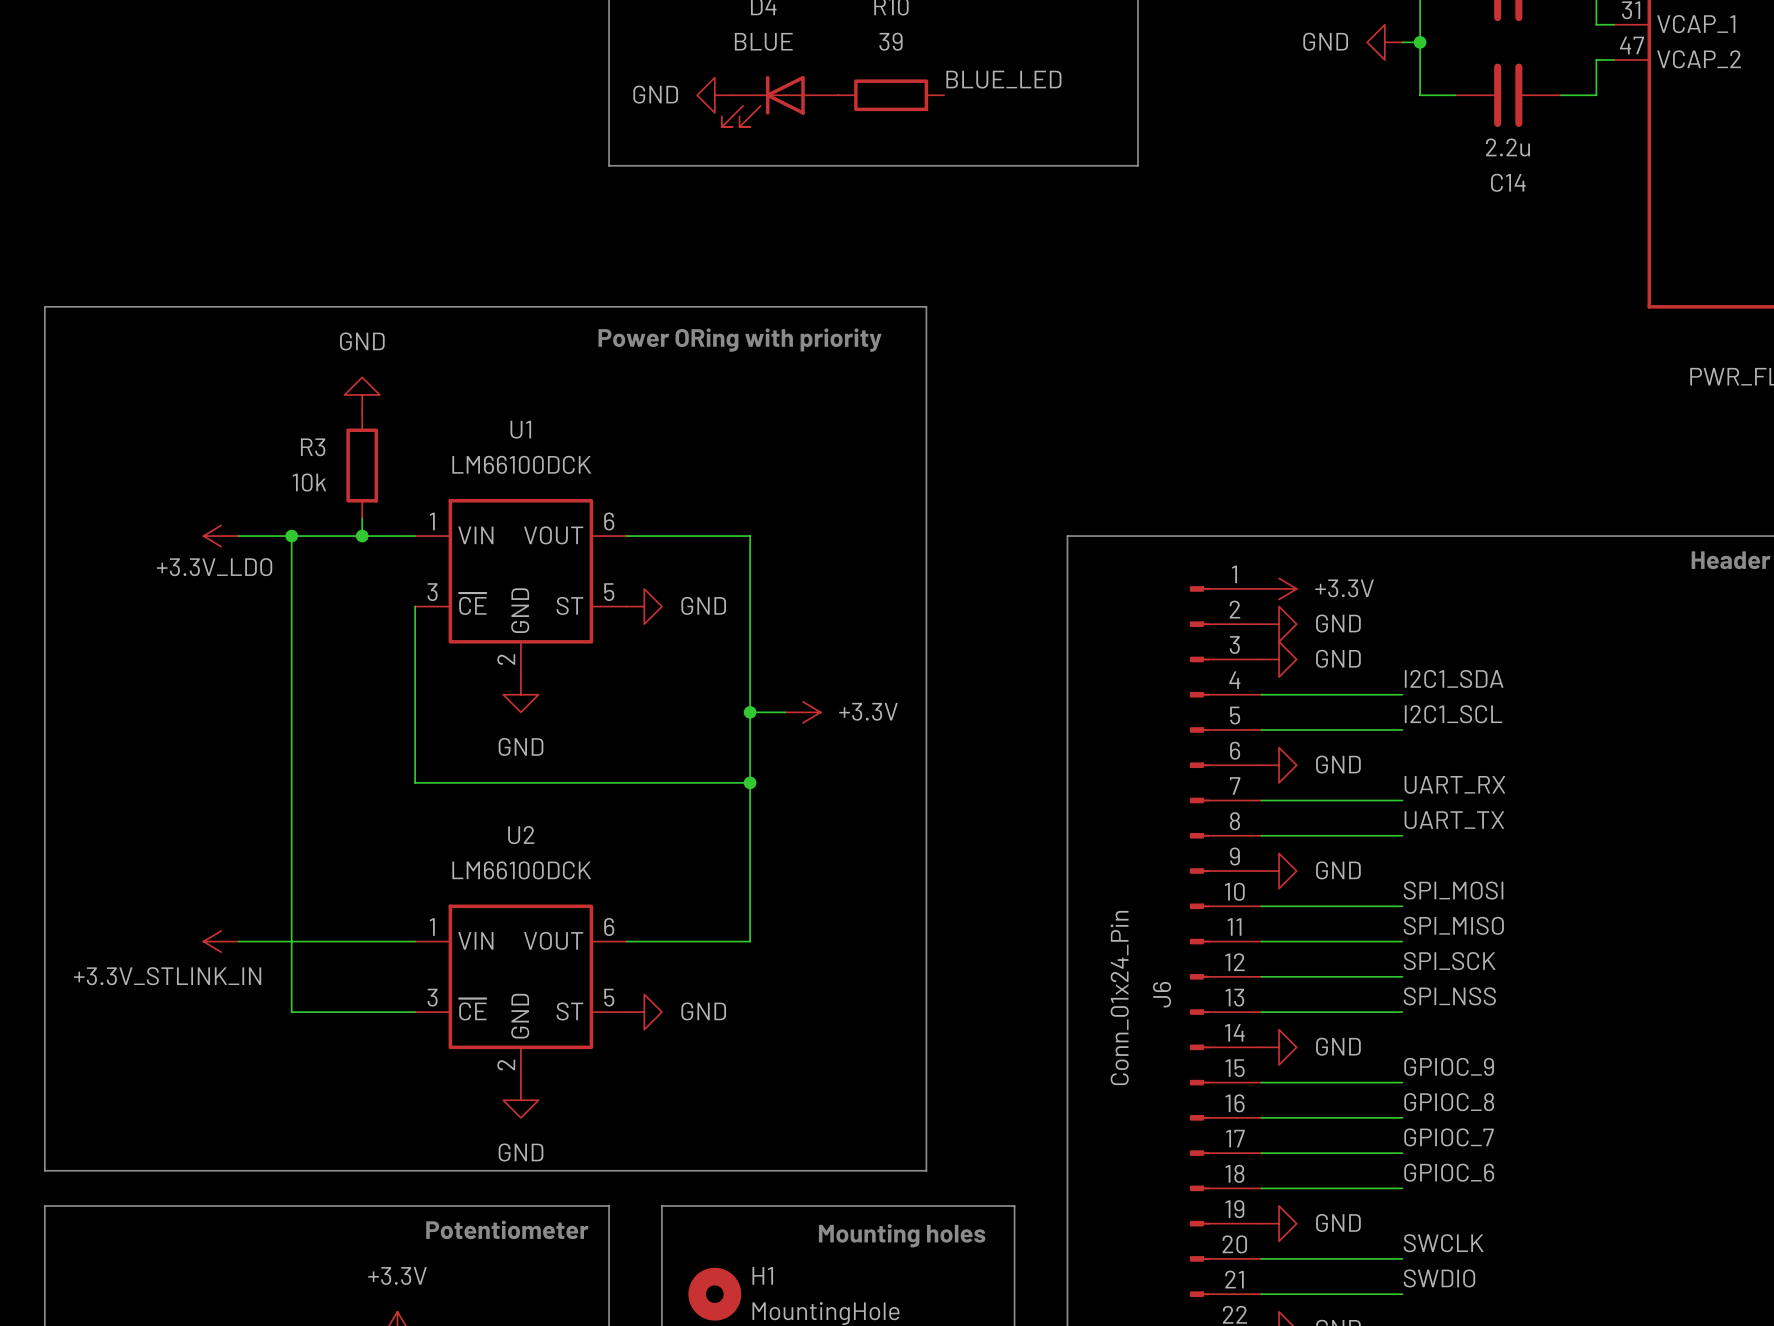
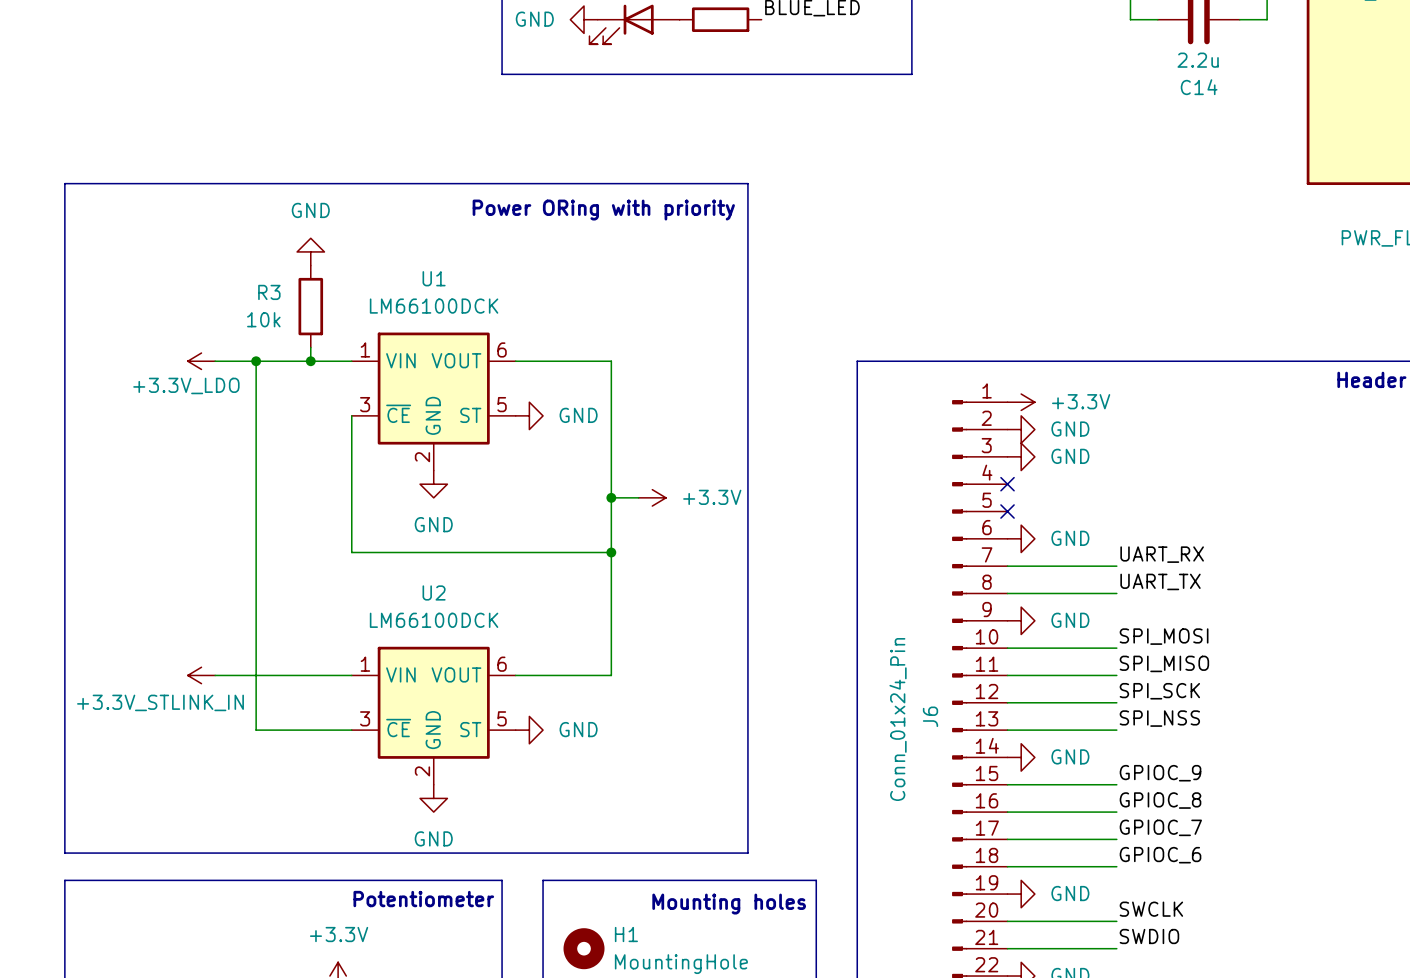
label: I2C1_SDA (1454, 679) -> none
wire: (1261, 694) (1402, 694) -> none
no-connect mark: none -> (1007, 484)
label: I2C1_SCL (1453, 714) -> none
wire: (1261, 729) (1402, 729) -> none
no-connect mark: none -> (1007, 511)

